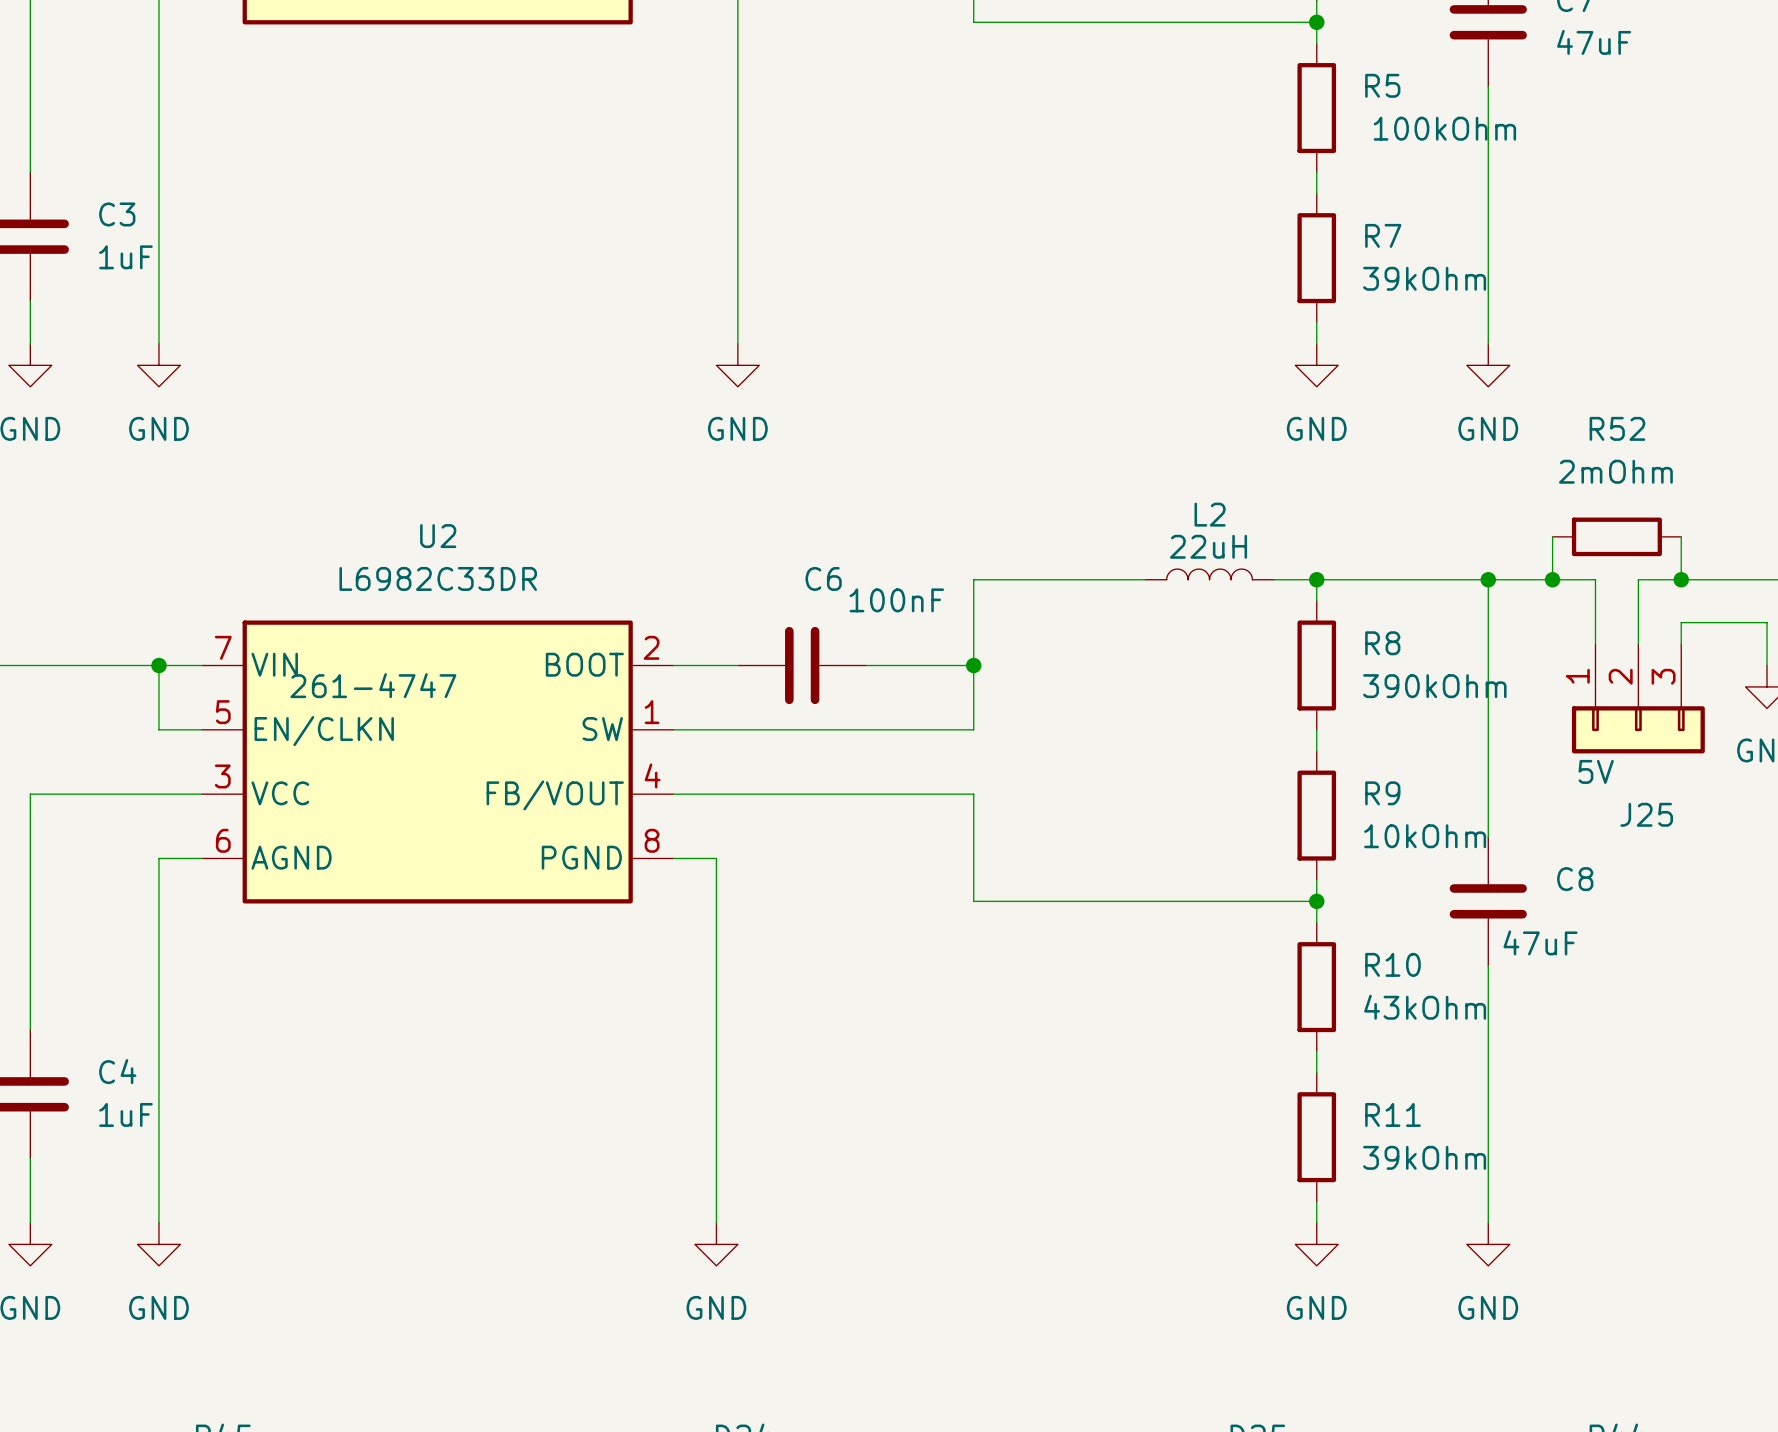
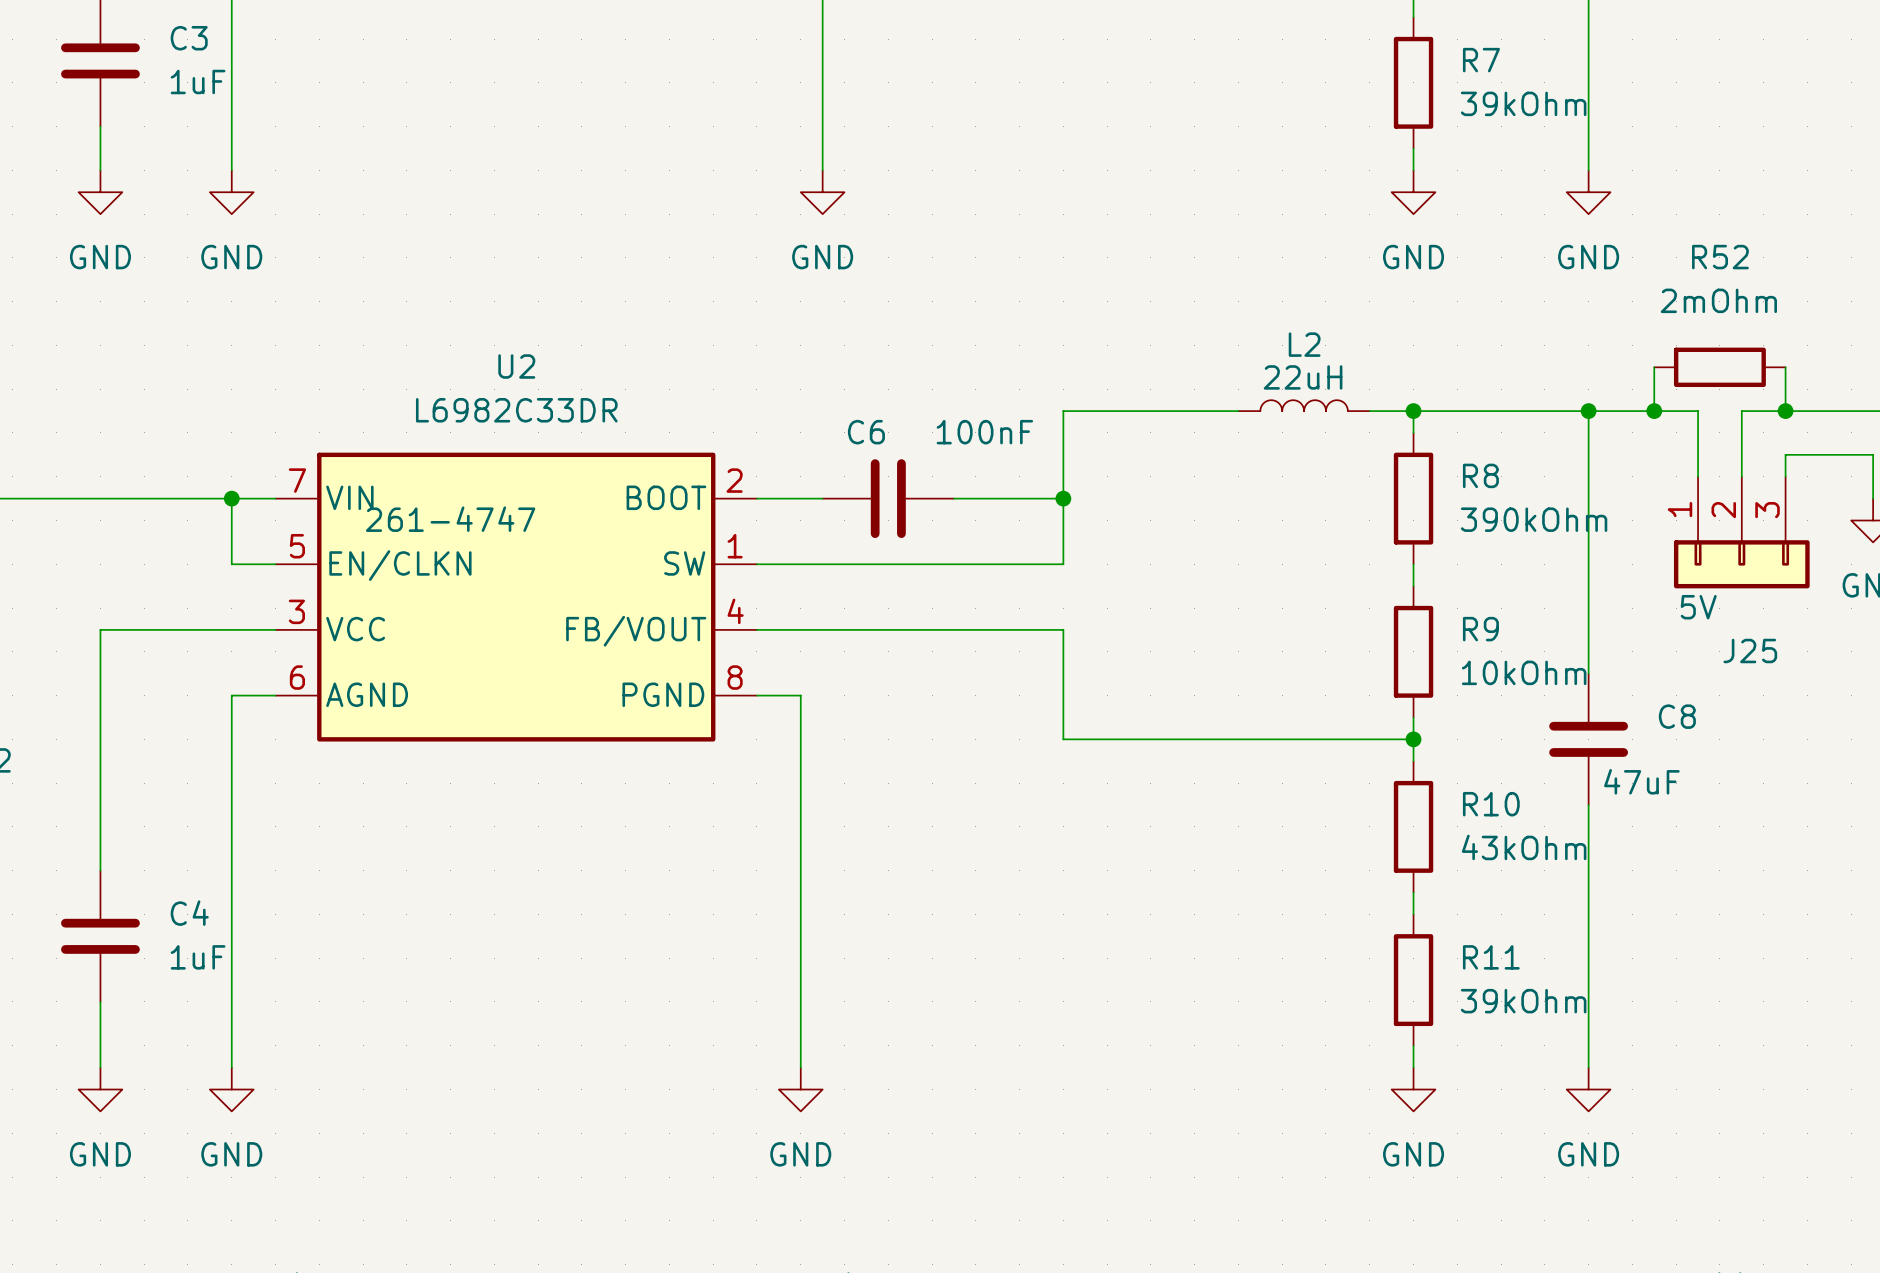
C6 name position: C6 (823, 578) -> C6 (866, 432)

